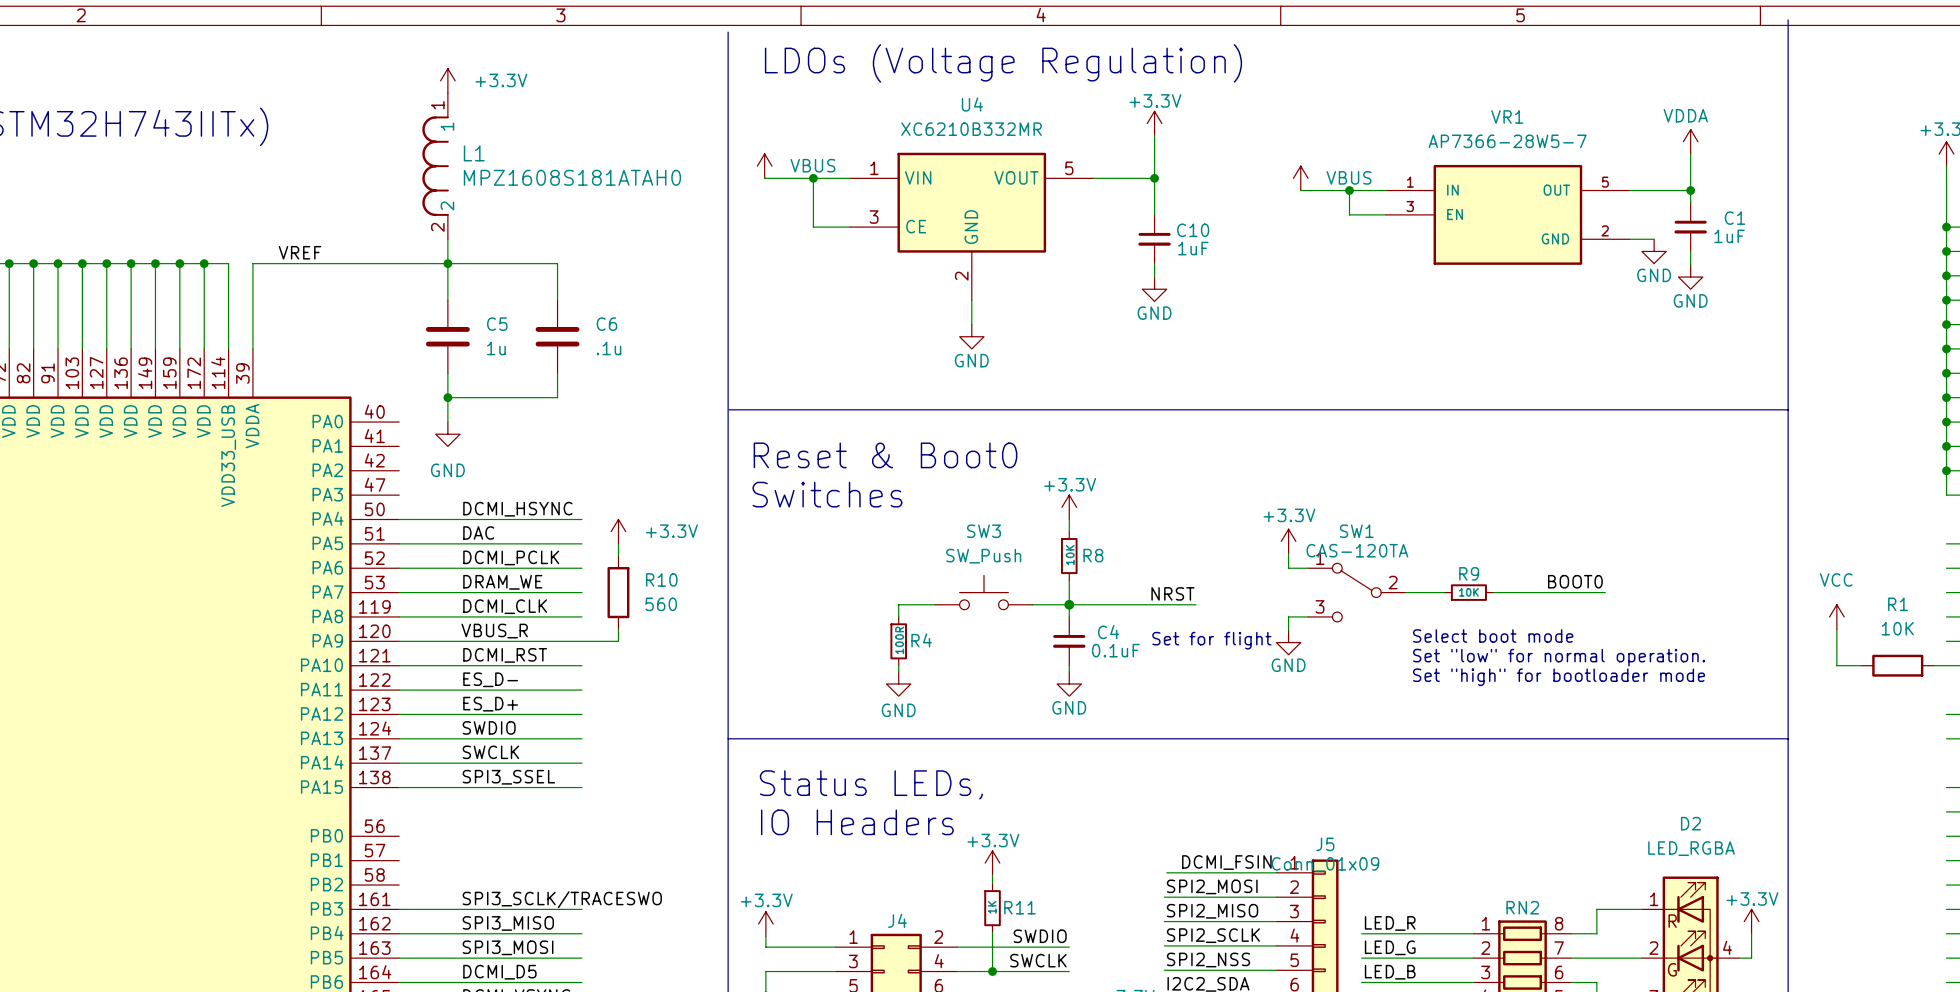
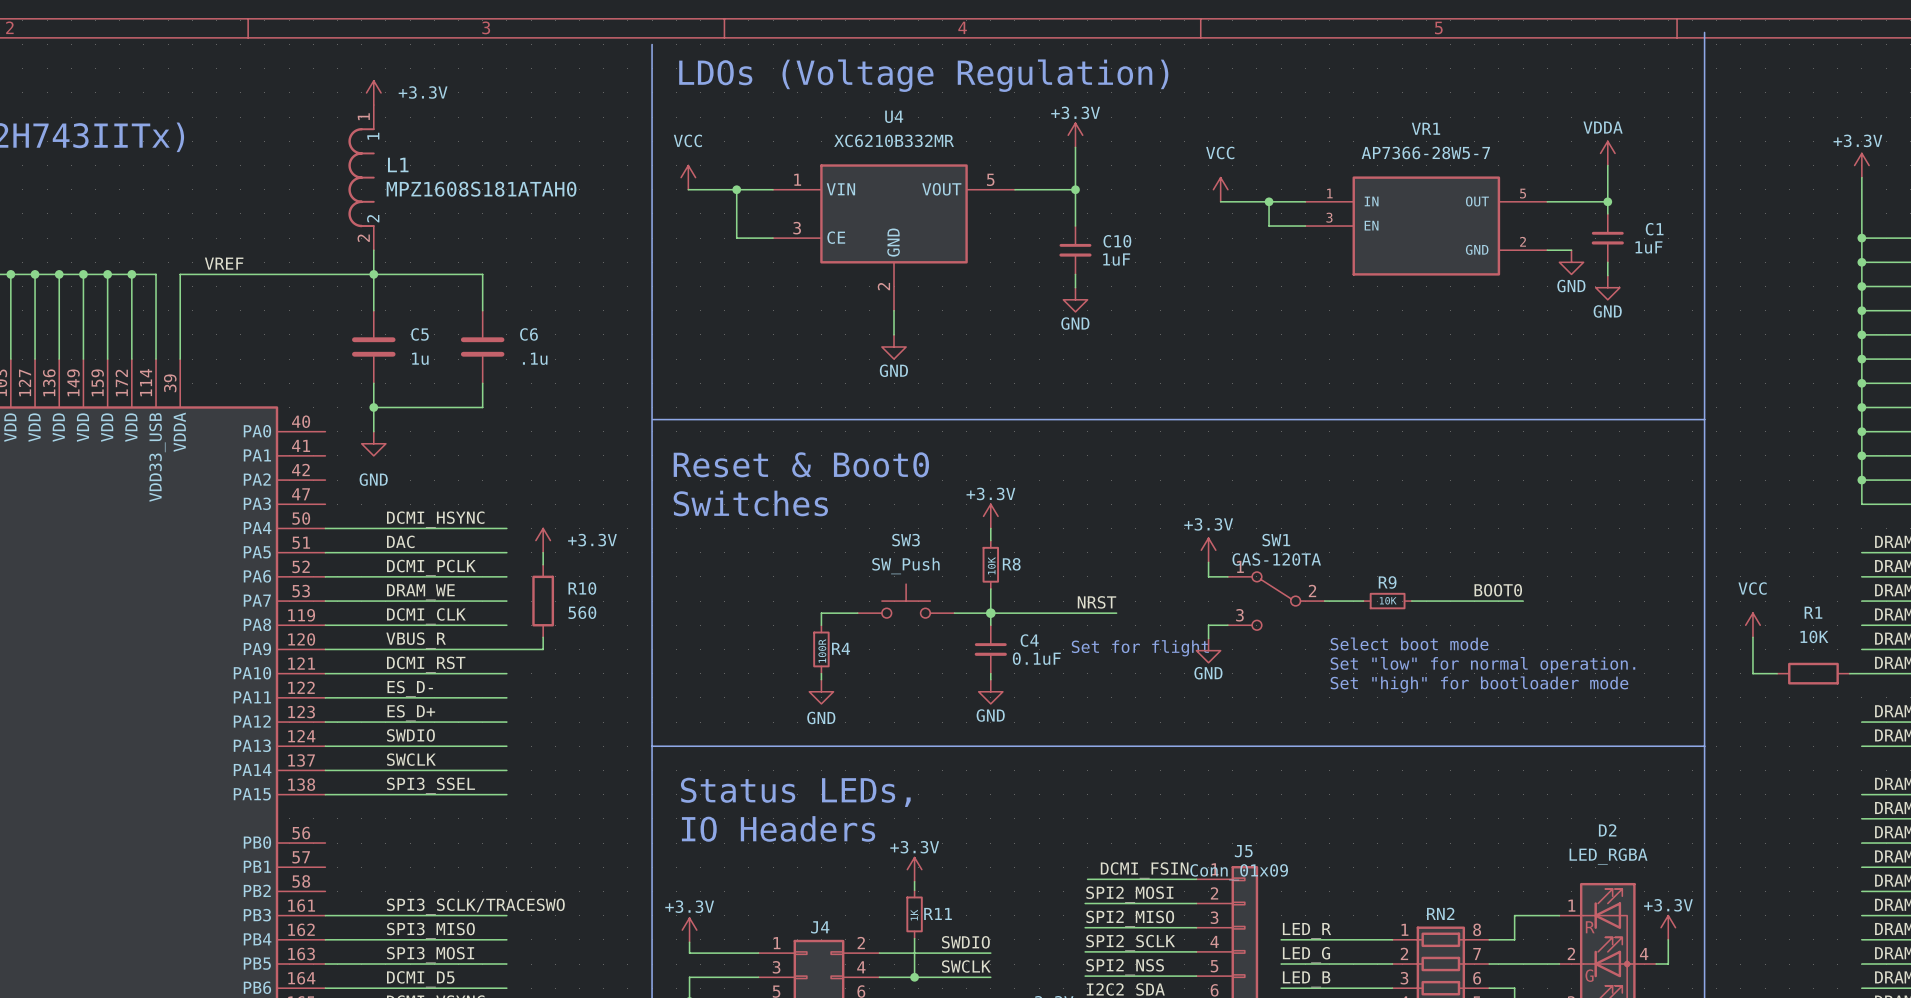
power symbol: VBUS (764, 166) -> VCC (688, 177)
power symbol: VBUS (1300, 178) -> VCC (1220, 189)

